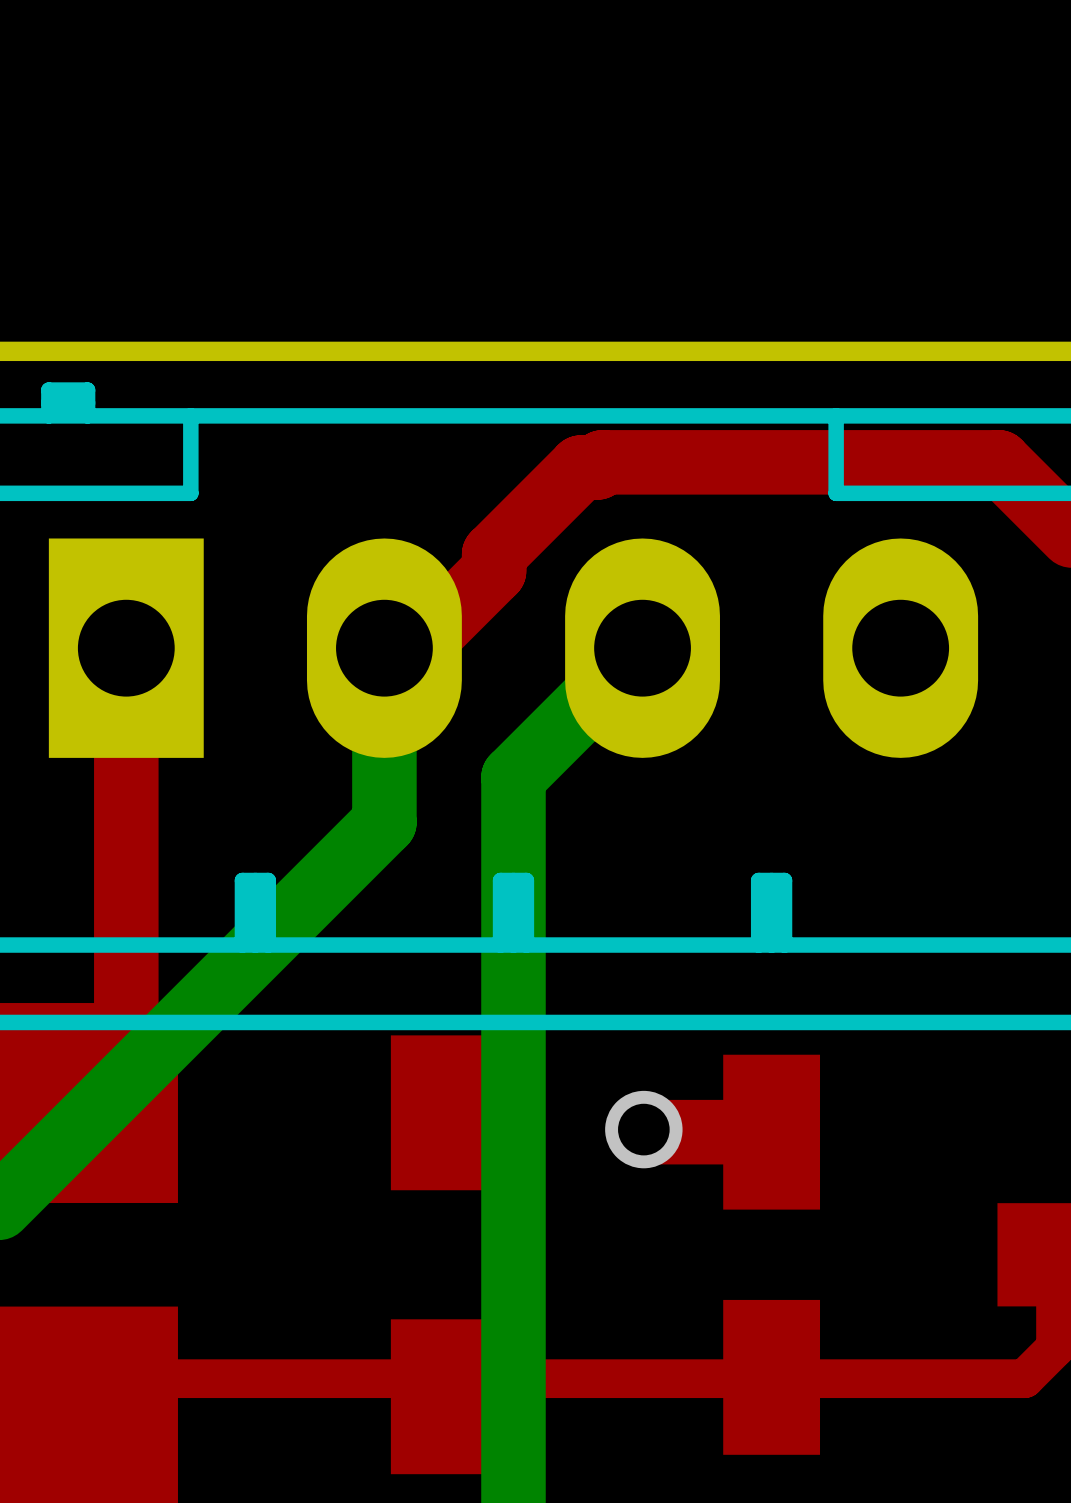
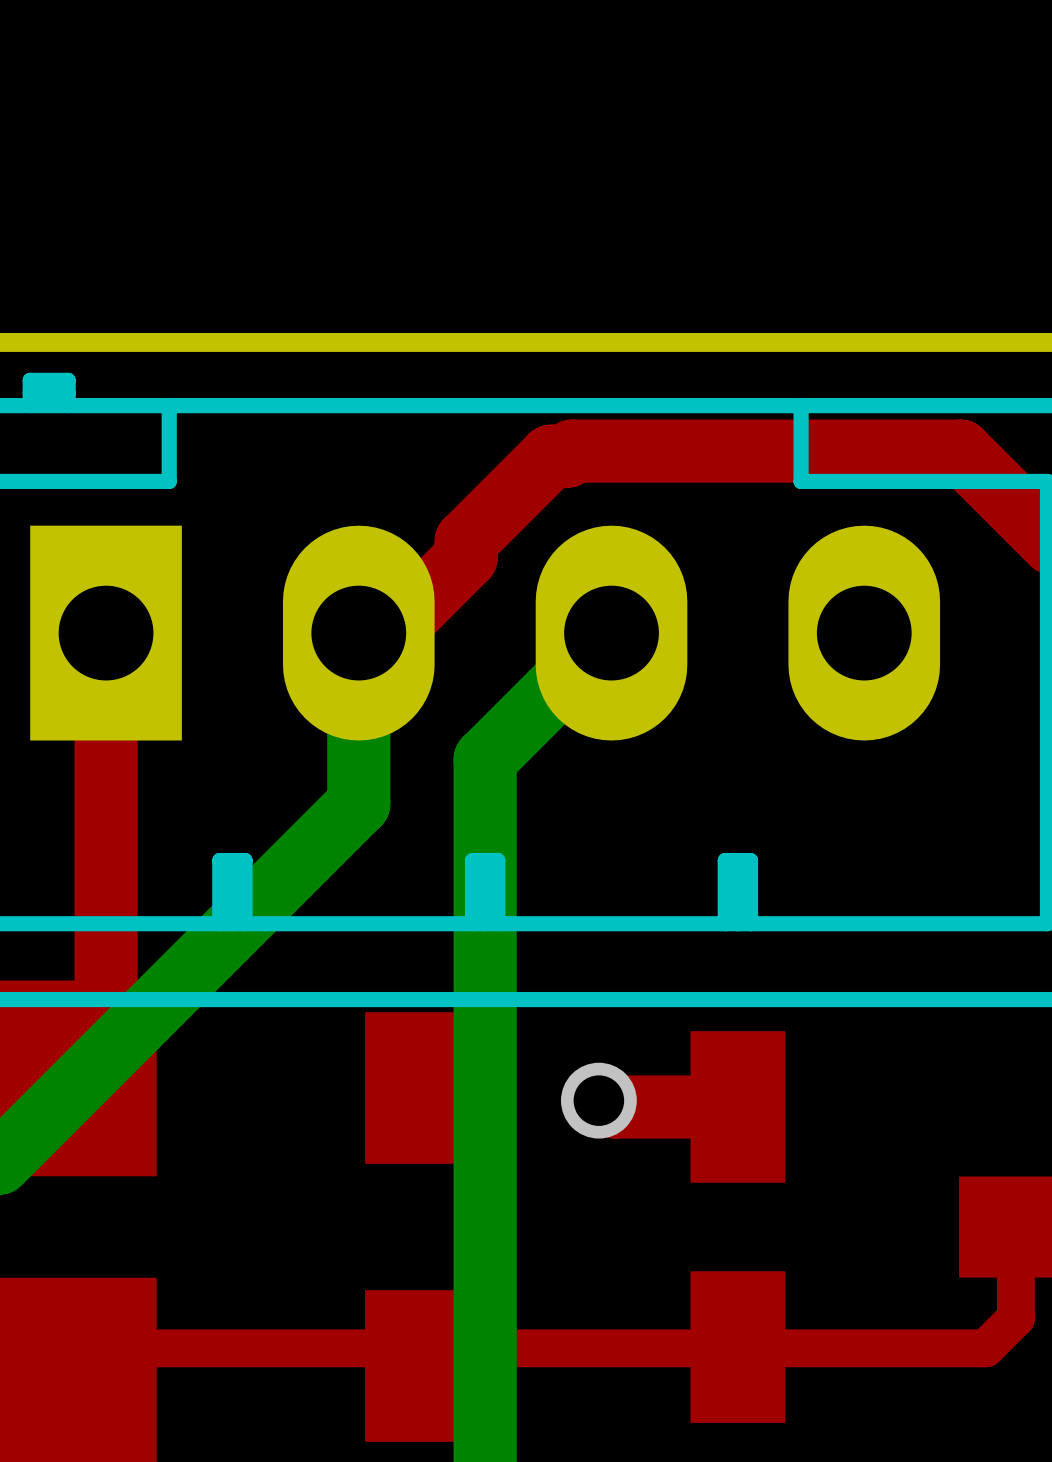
via position: (643, 1129) -> (598, 1100)

